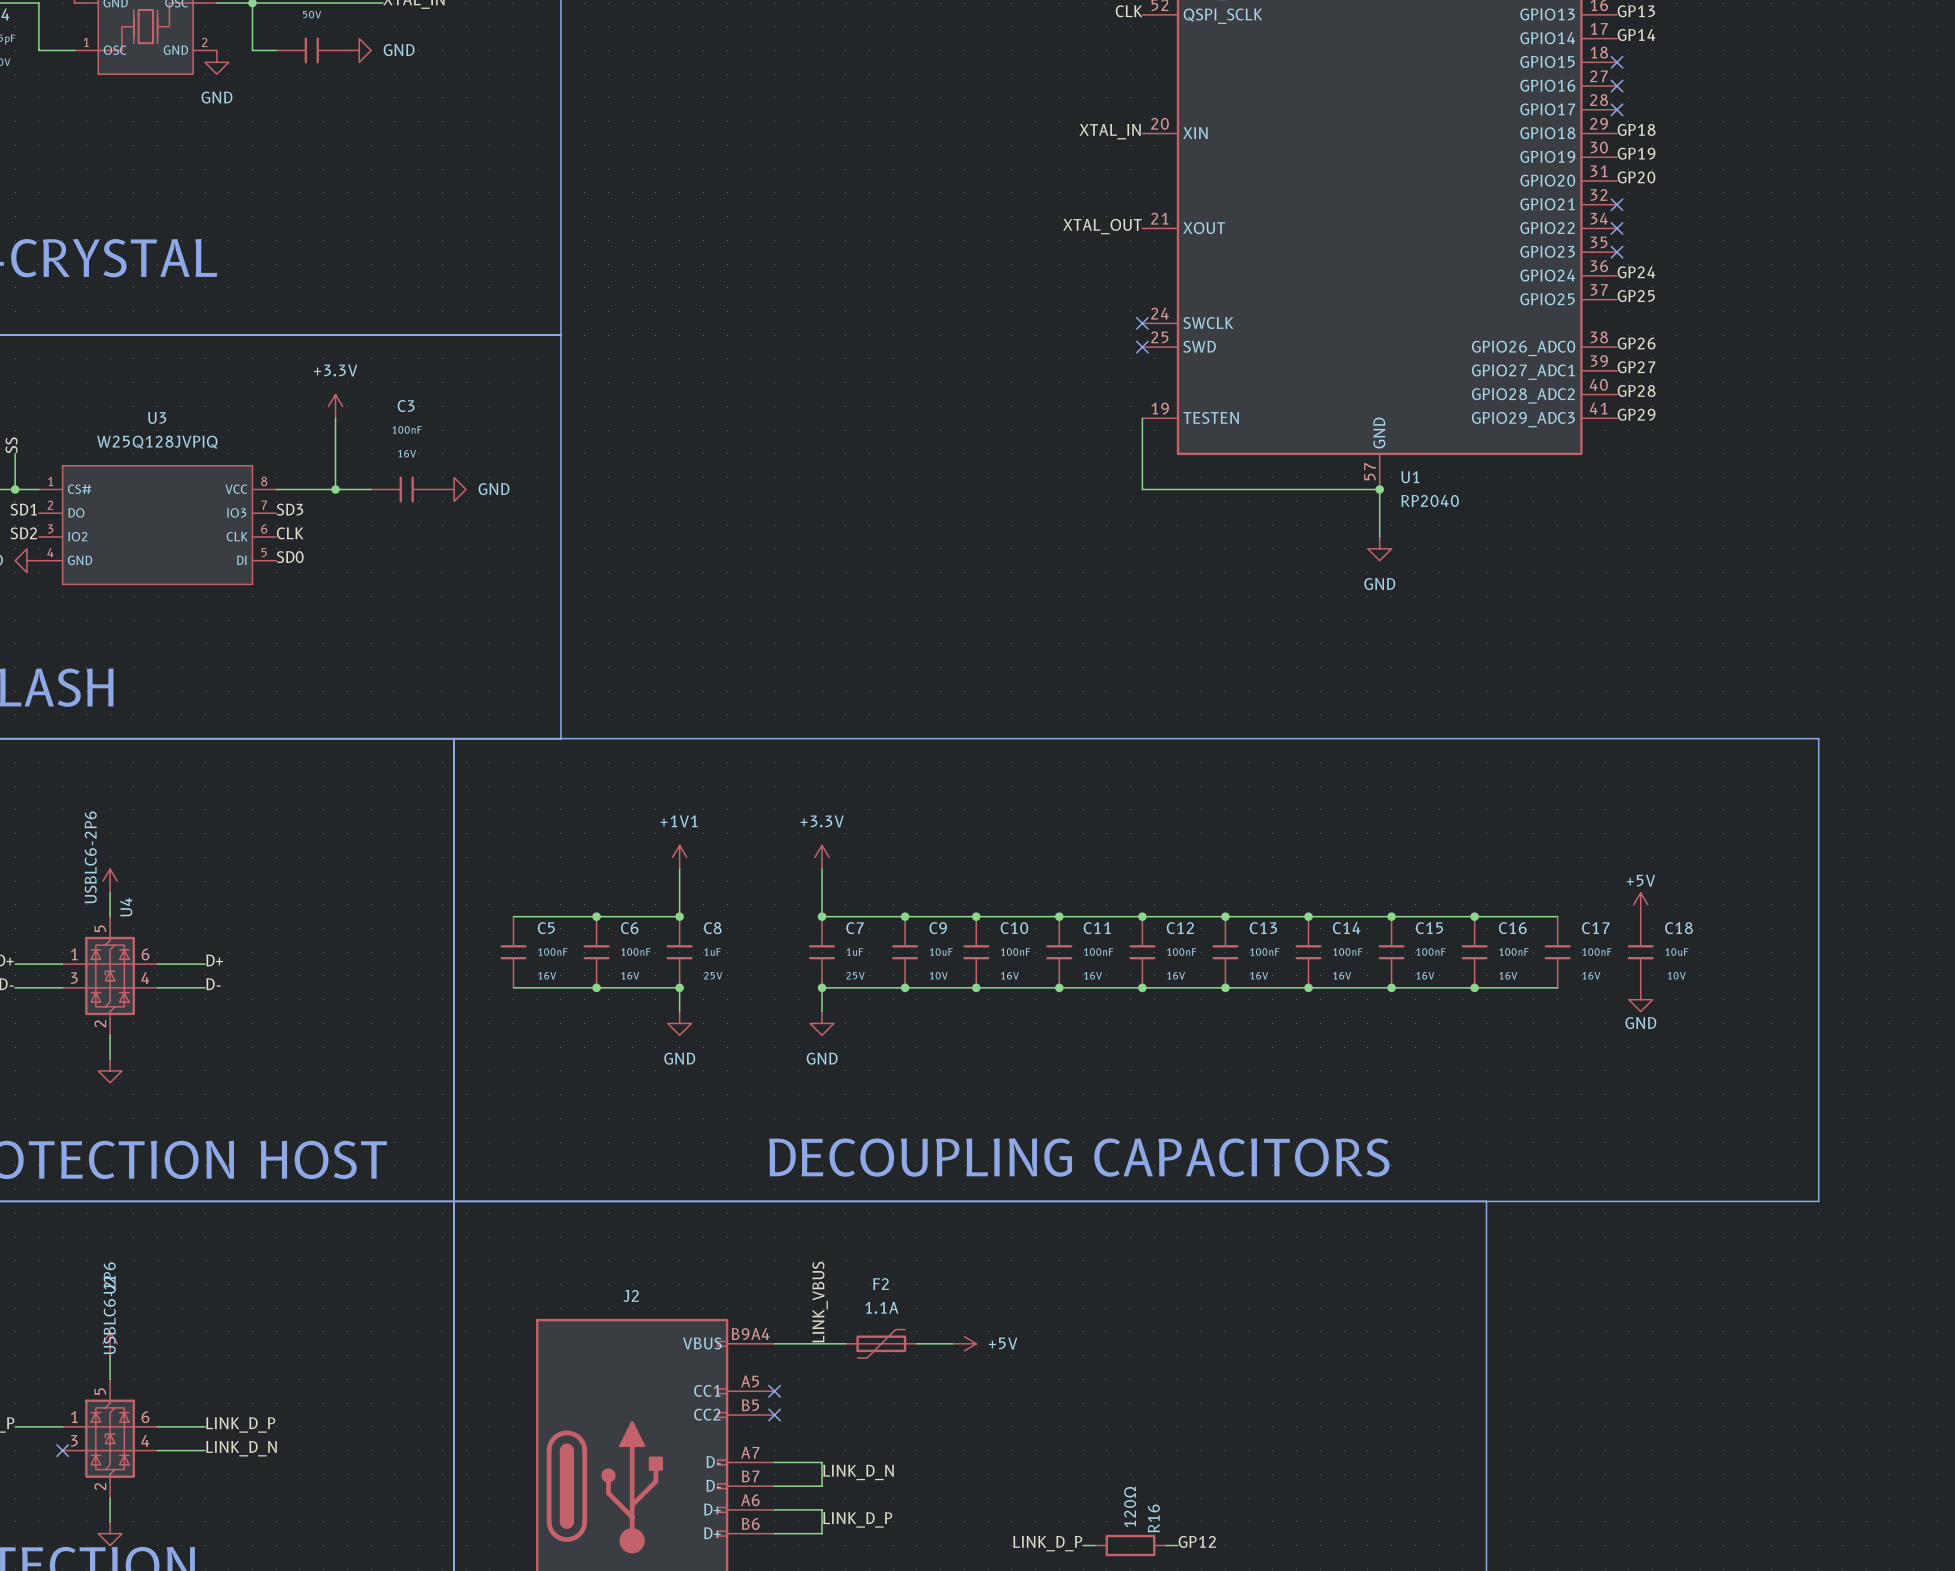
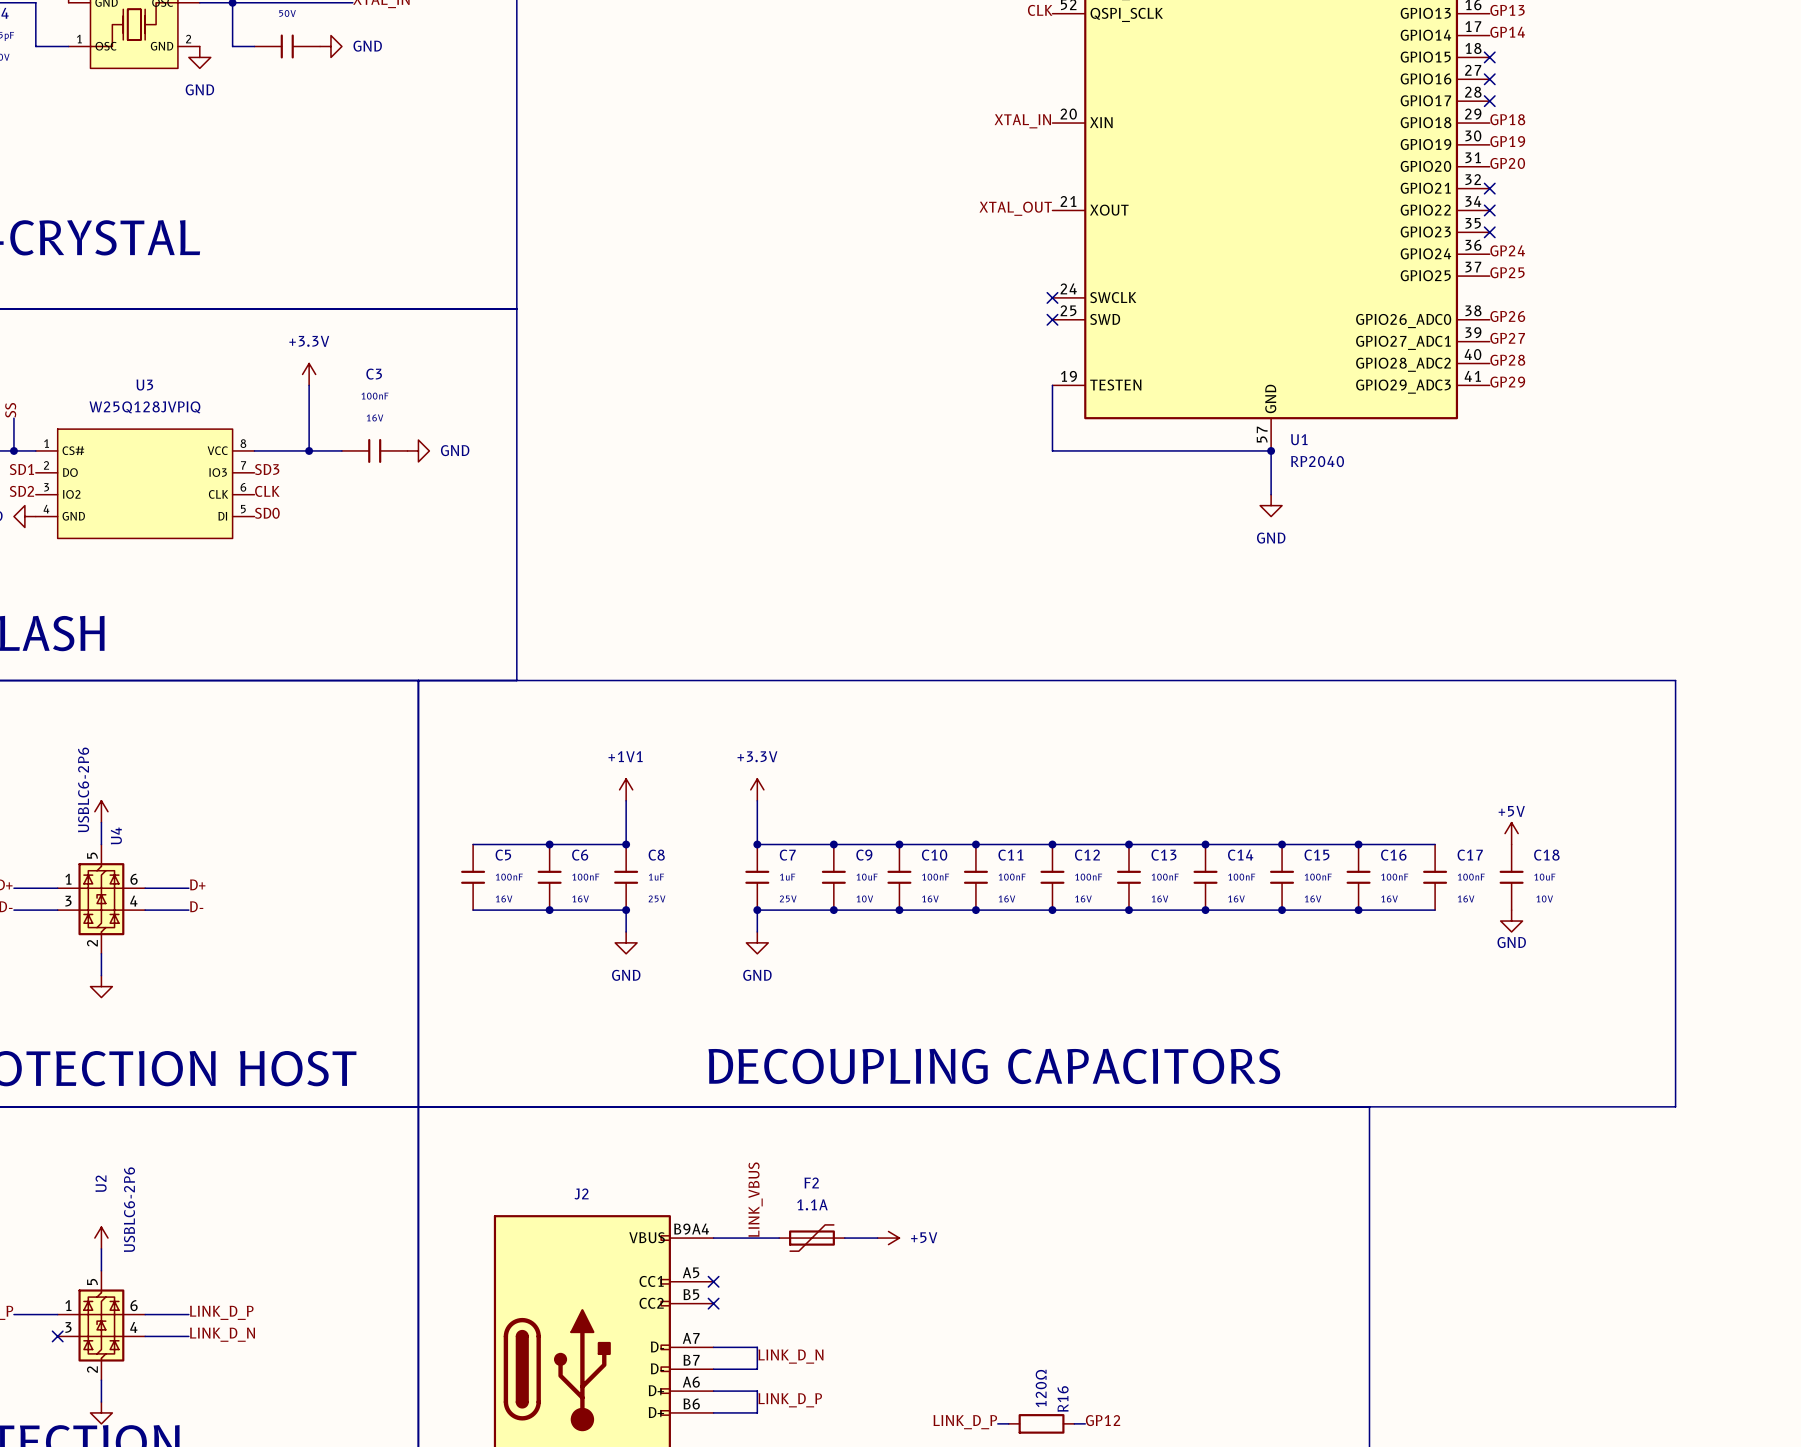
U2 value position: USBLC6-2P6 (109, 1308) -> USBLC6-2P6 (129, 1209)

